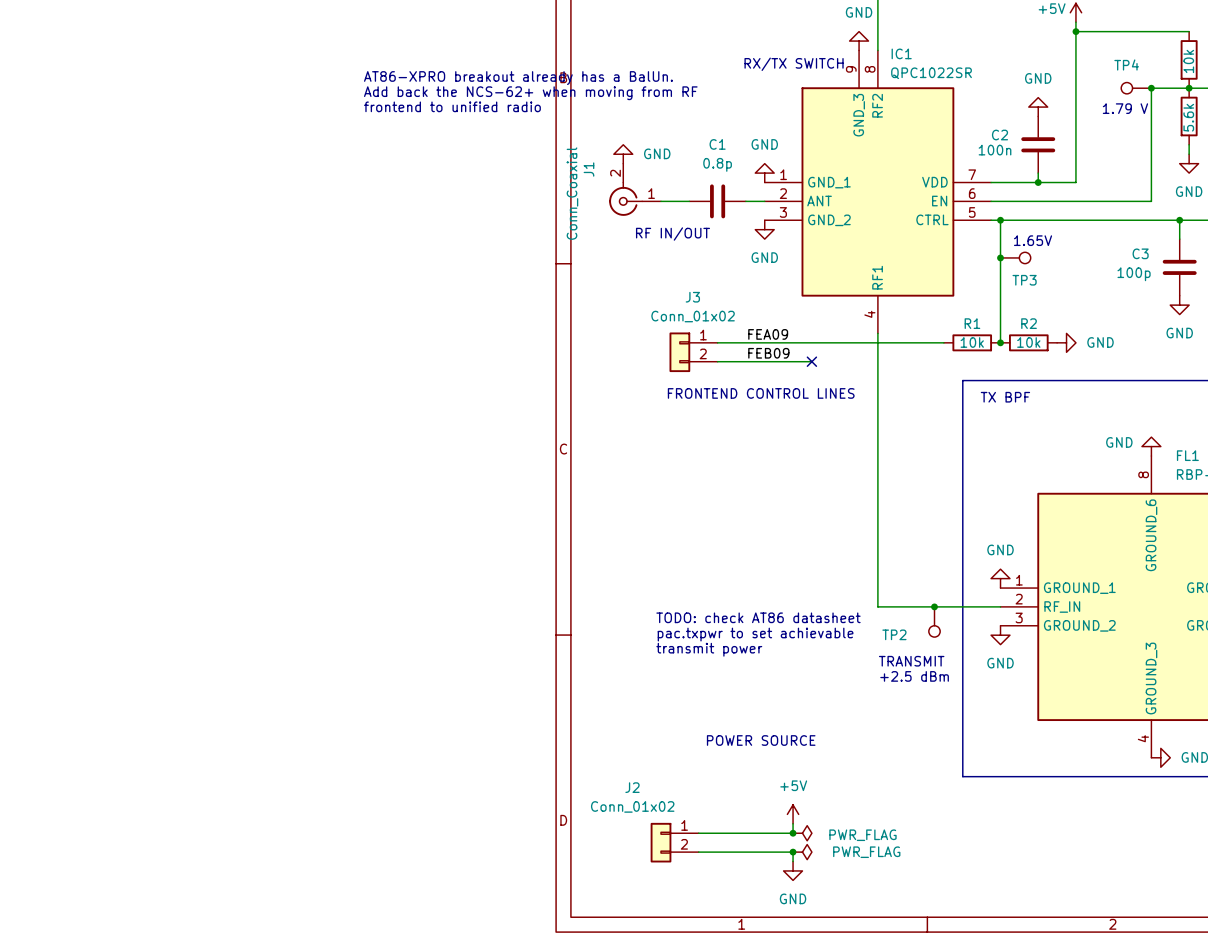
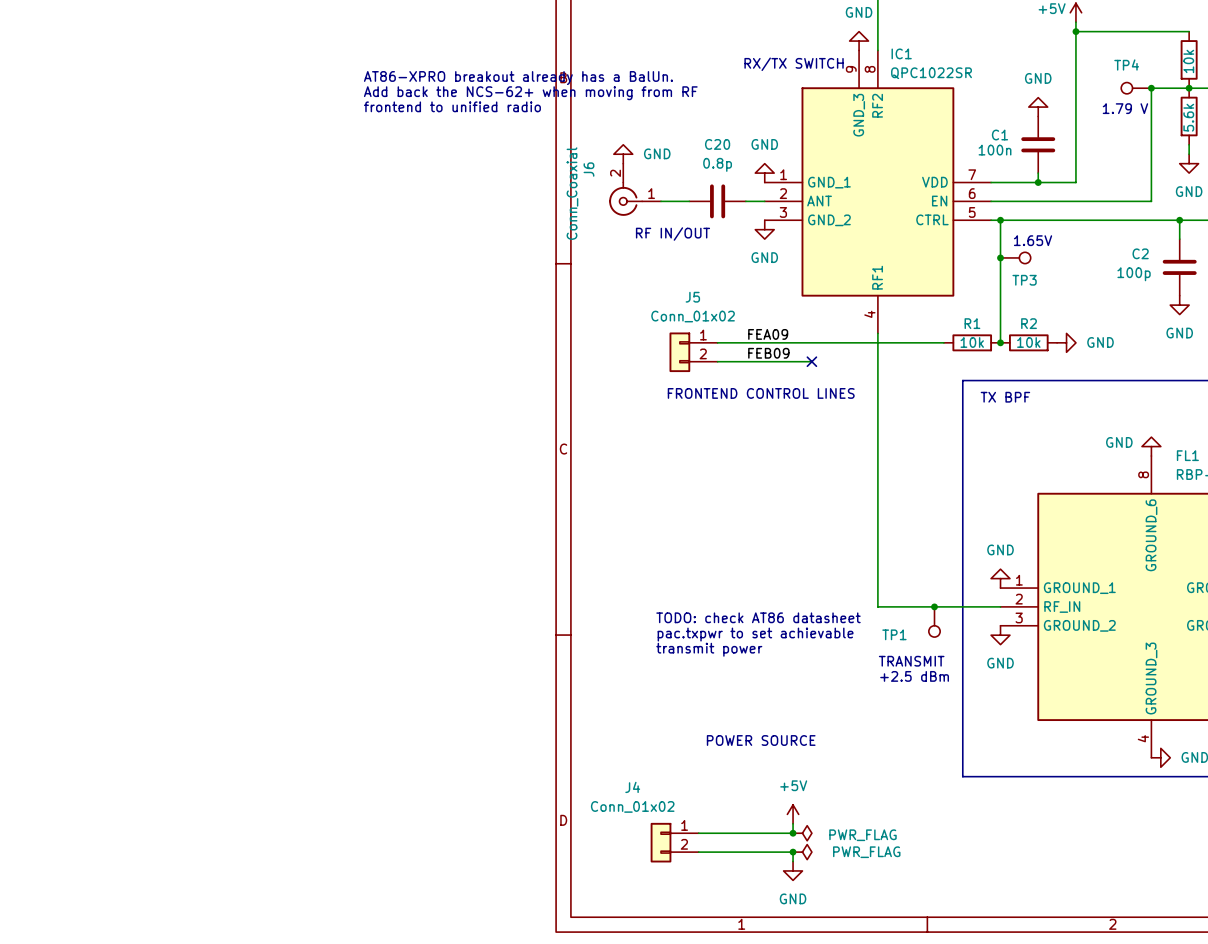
C2 name: C2 (999, 135) -> C1 (999, 135)
C1 name: C1 (717, 144) -> C20 (717, 144)
J1 name: J1 (588, 169) -> J6 (588, 169)
C3 name: C3 (1140, 253) -> C2 (1140, 253)
J3 name: J3 (692, 297) -> J5 (692, 297)
TP2 name: TP2 (894, 634) -> TP1 (894, 634)
J2 name: J2 (632, 787) -> J4 (632, 787)

